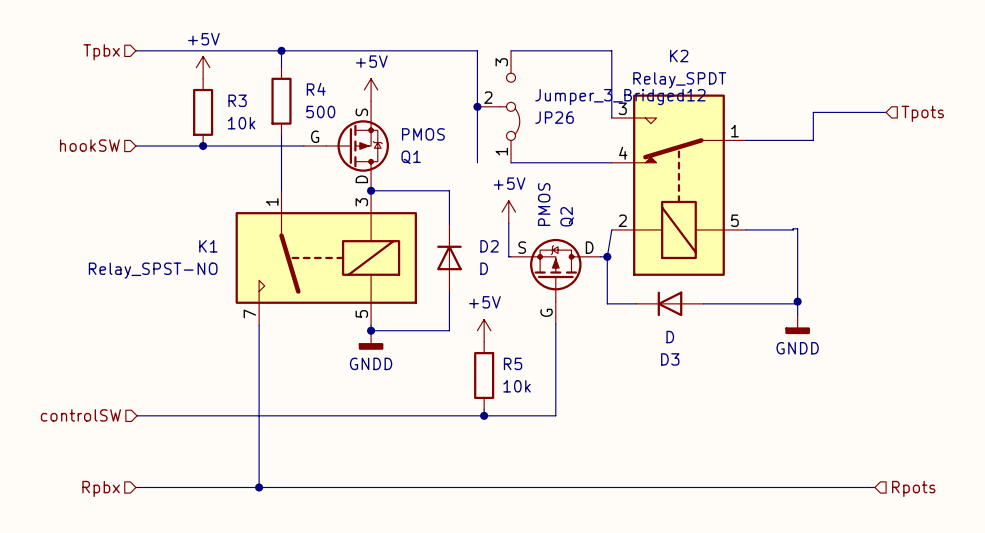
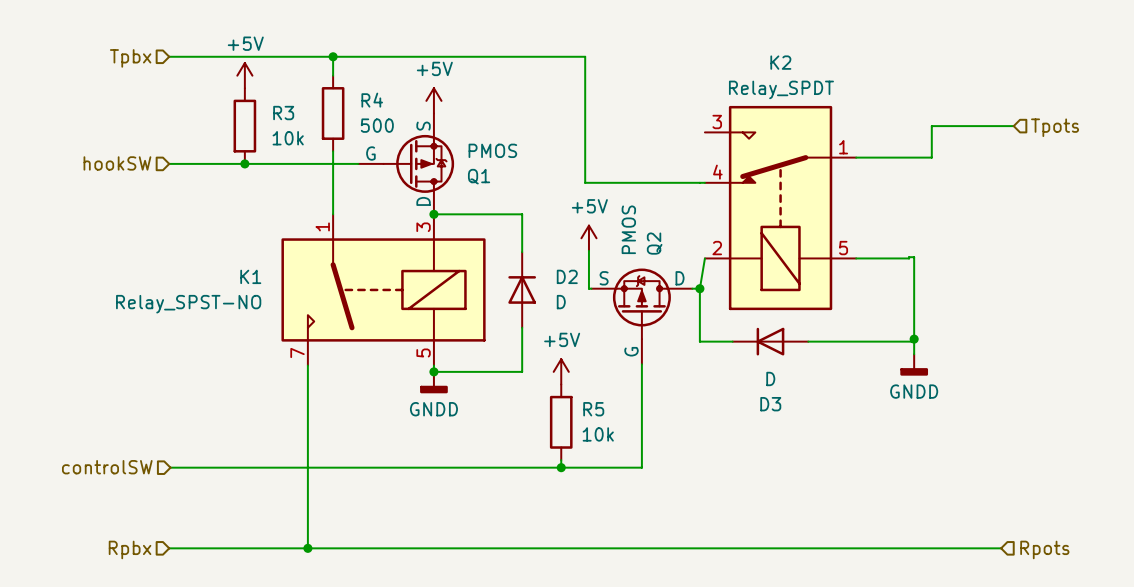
wire: (477, 50) (477, 162) -> (553, 56) (585, 56) (585, 182) (591, 182)
wire: (511, 50) (611, 50) (611, 118) -> none
junction: (477, 106) -> none
JP26: Jumper_3_Bridged12 (498, 106) -> none

